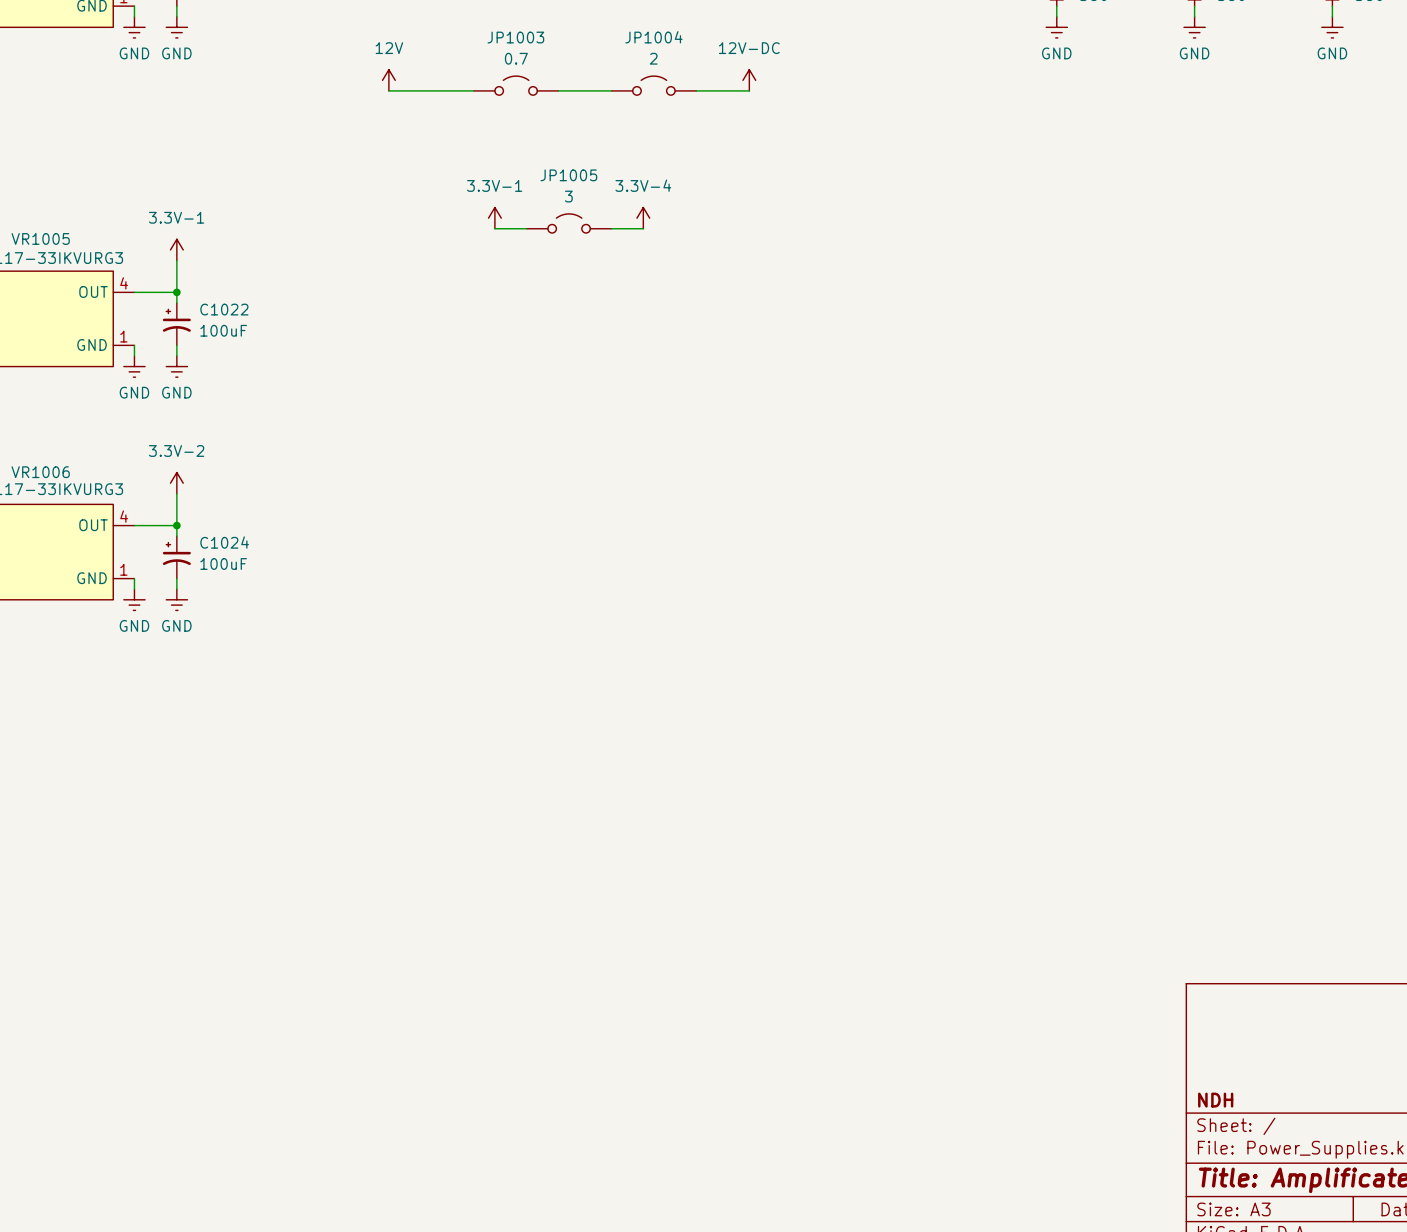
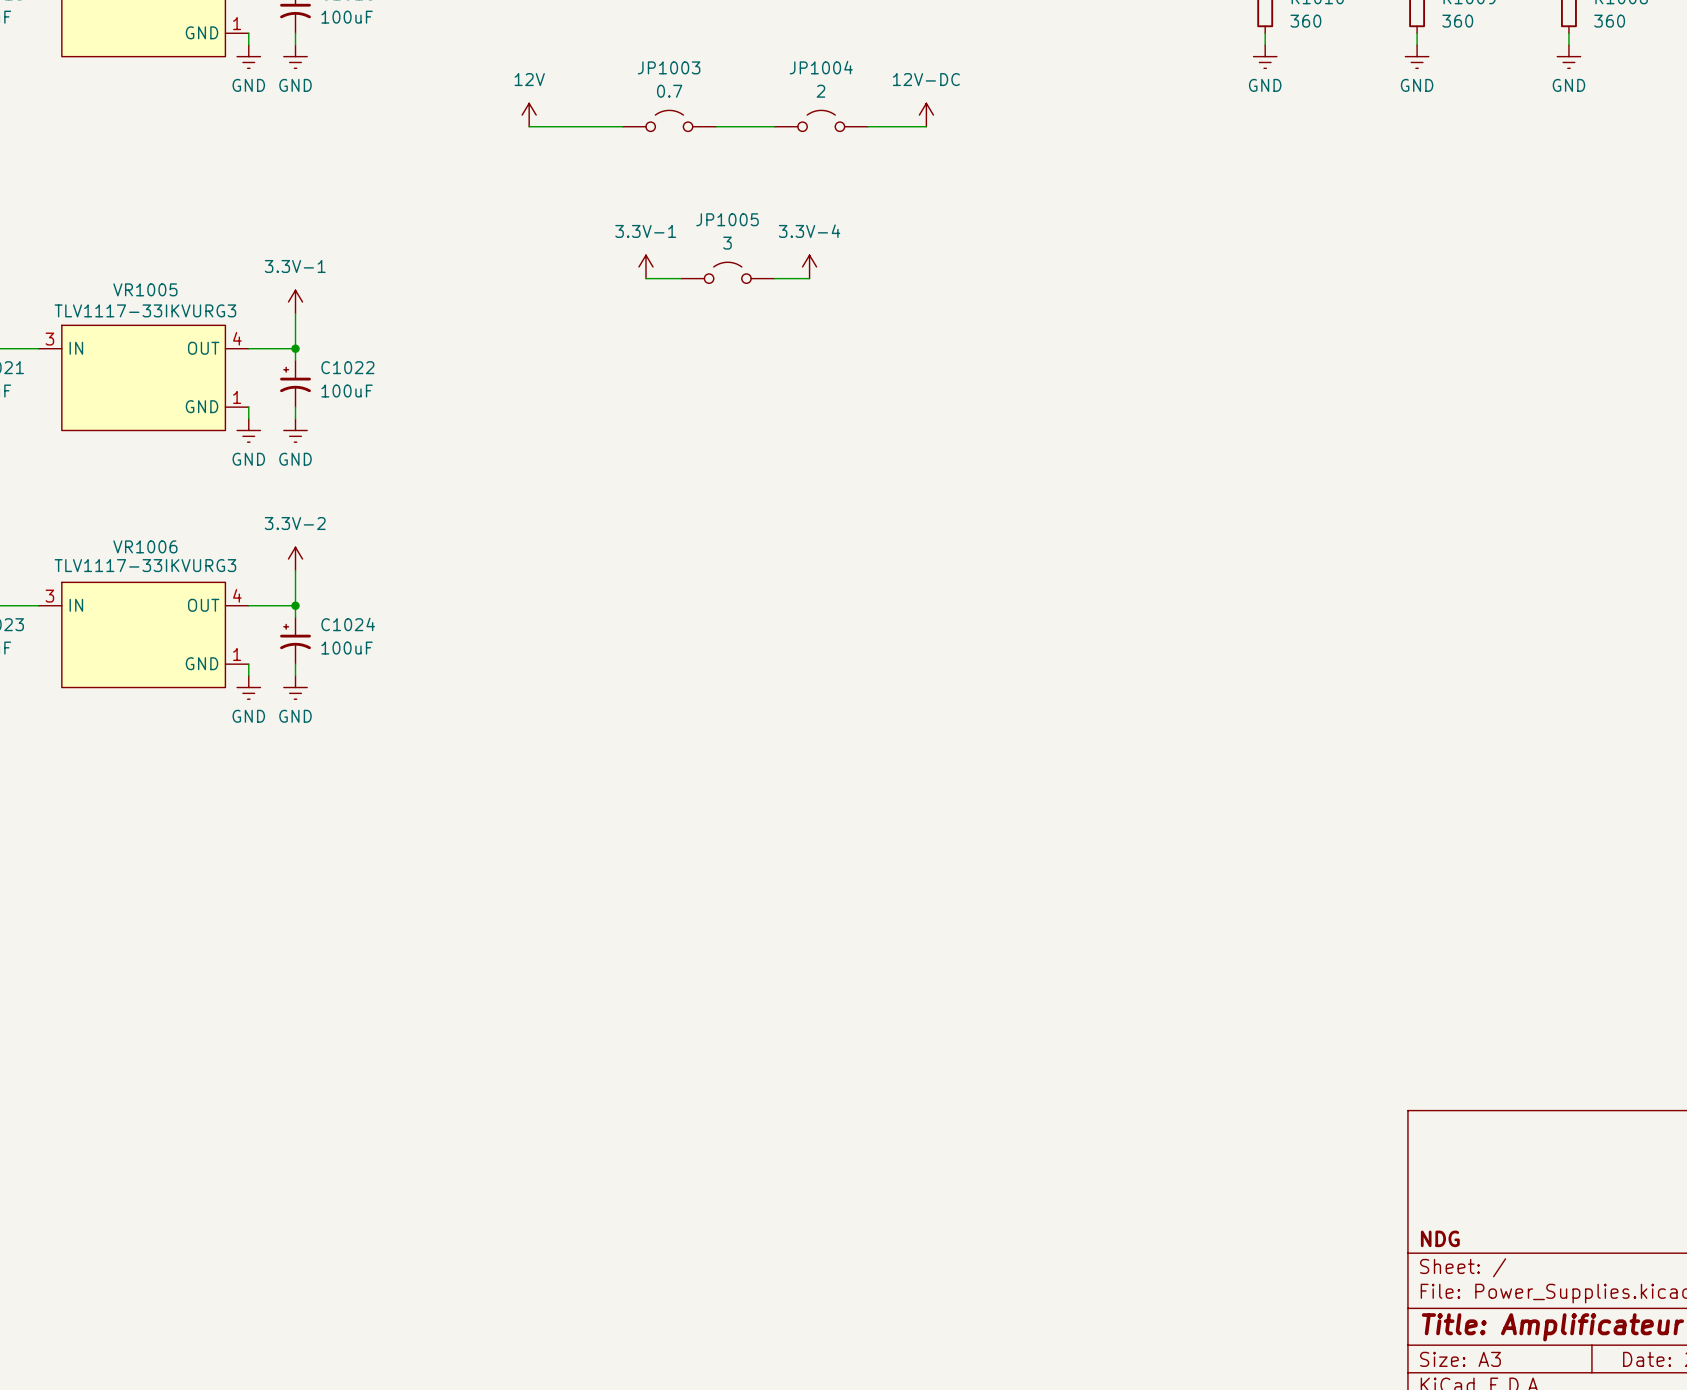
title block: NDH (1215, 1100) -> NDG (1440, 1238)

